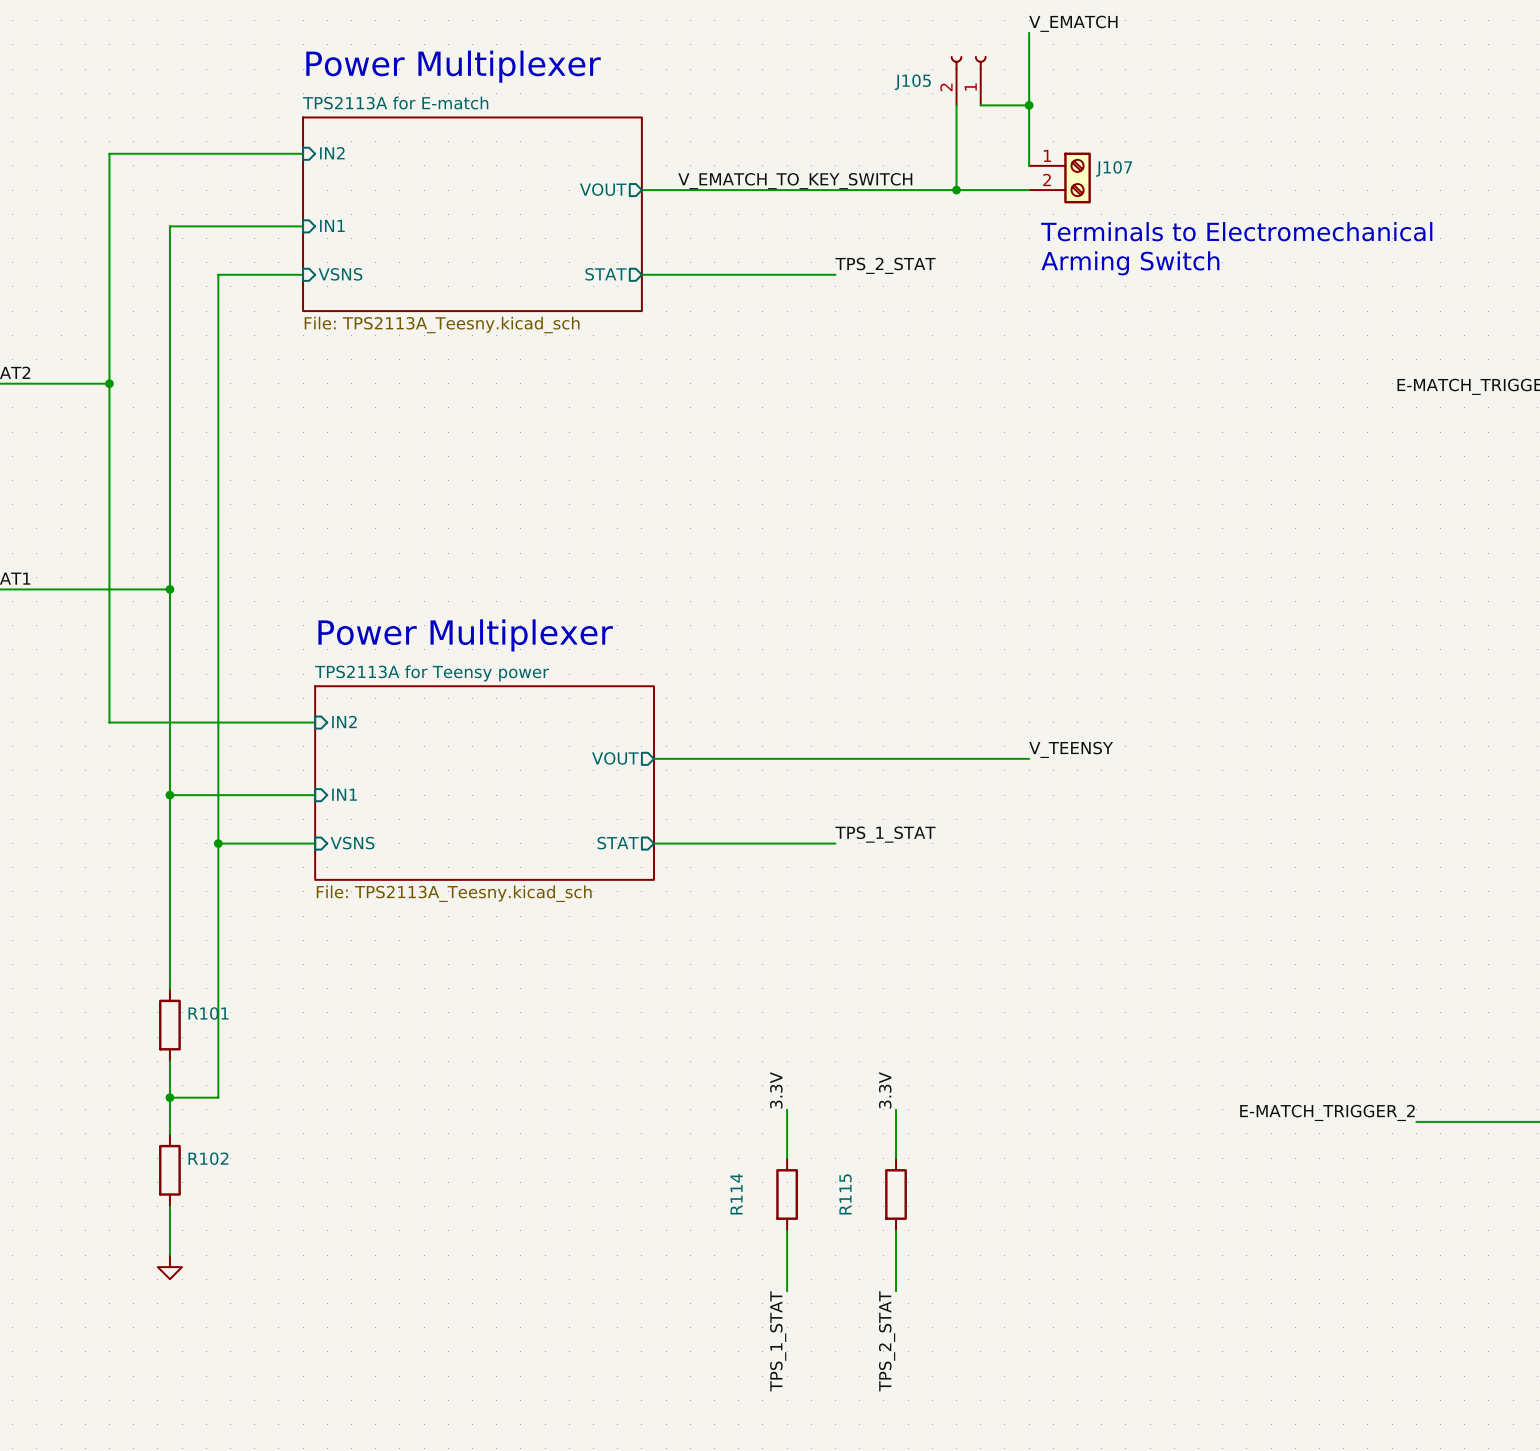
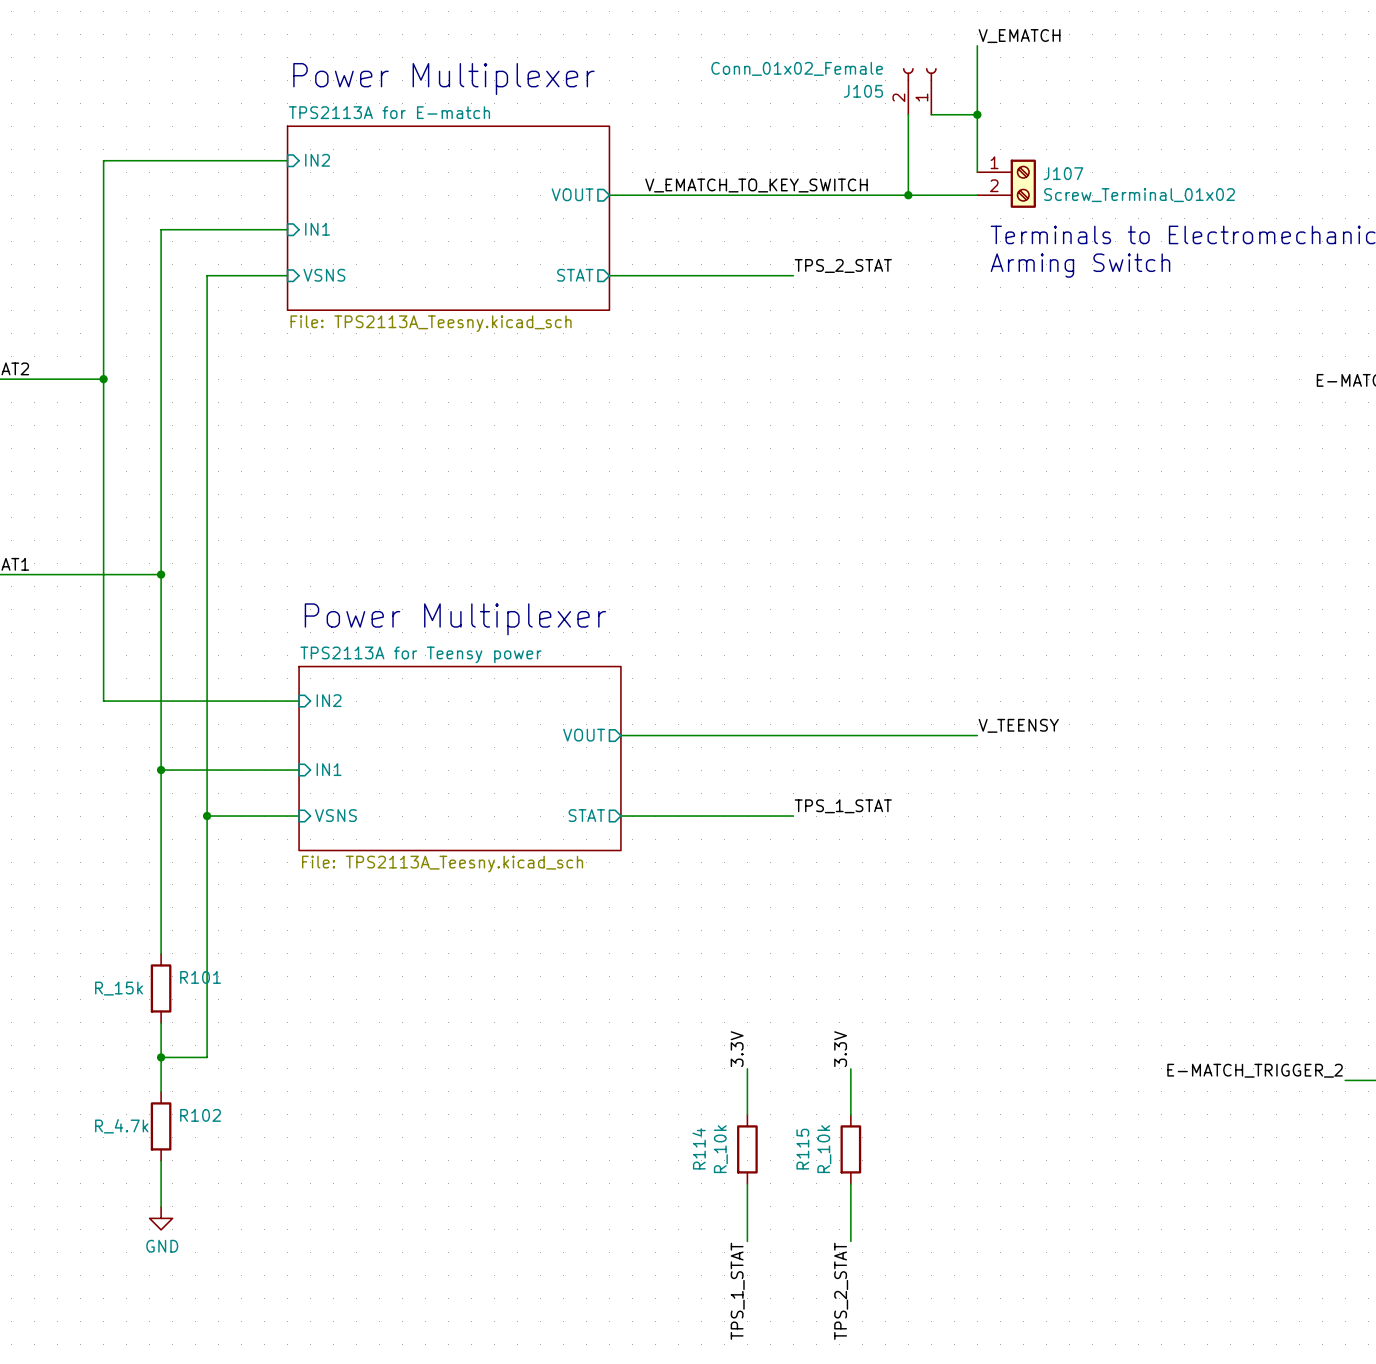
J105 value: none -> Conn_01x02_Female (797, 68)
J107 value: none -> Screw_Terminal_01x02 (1139, 195)
R101 value: none -> R_15k (119, 988)
R102 value: none -> R_4.7k (121, 1126)
R114 value: none -> R_10k (720, 1149)
R115 value: none -> R_10k (824, 1149)
power symbol text: none -> GND (162, 1246)

